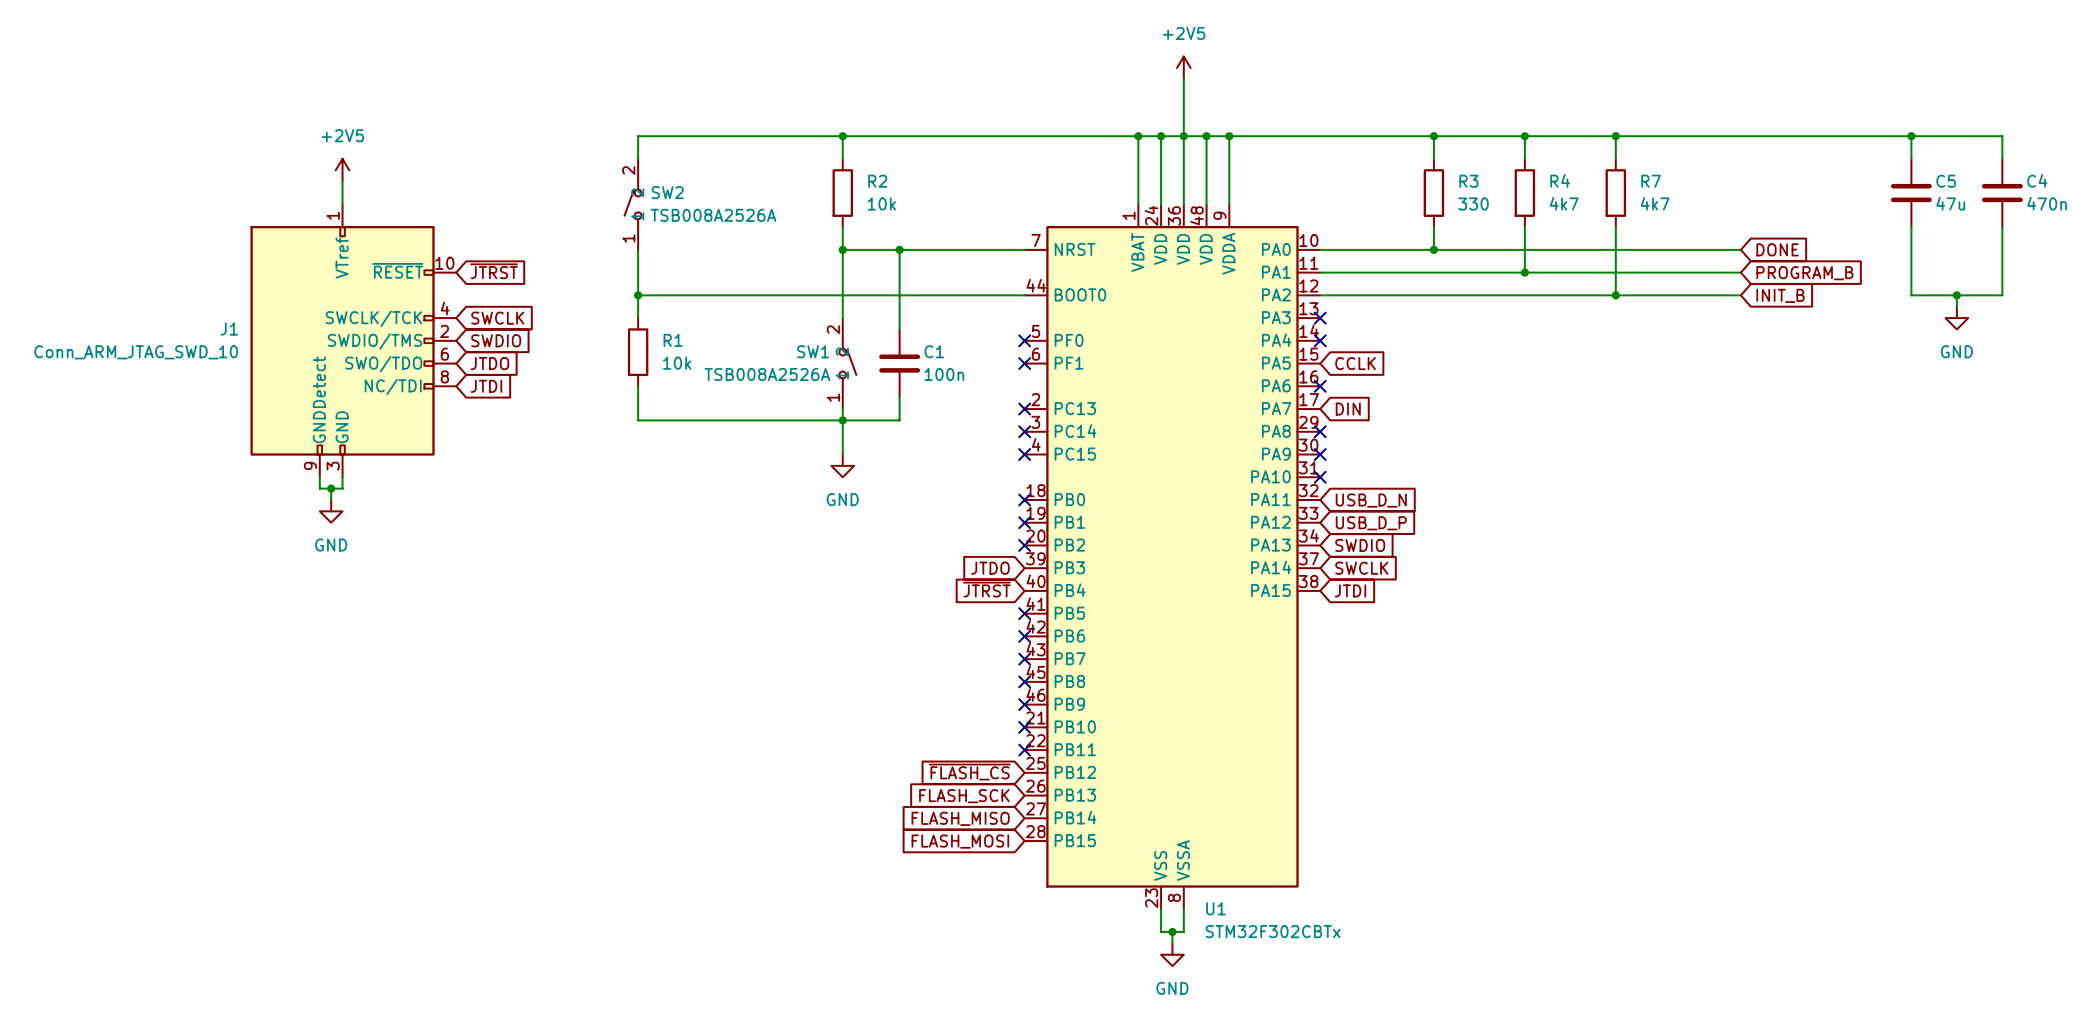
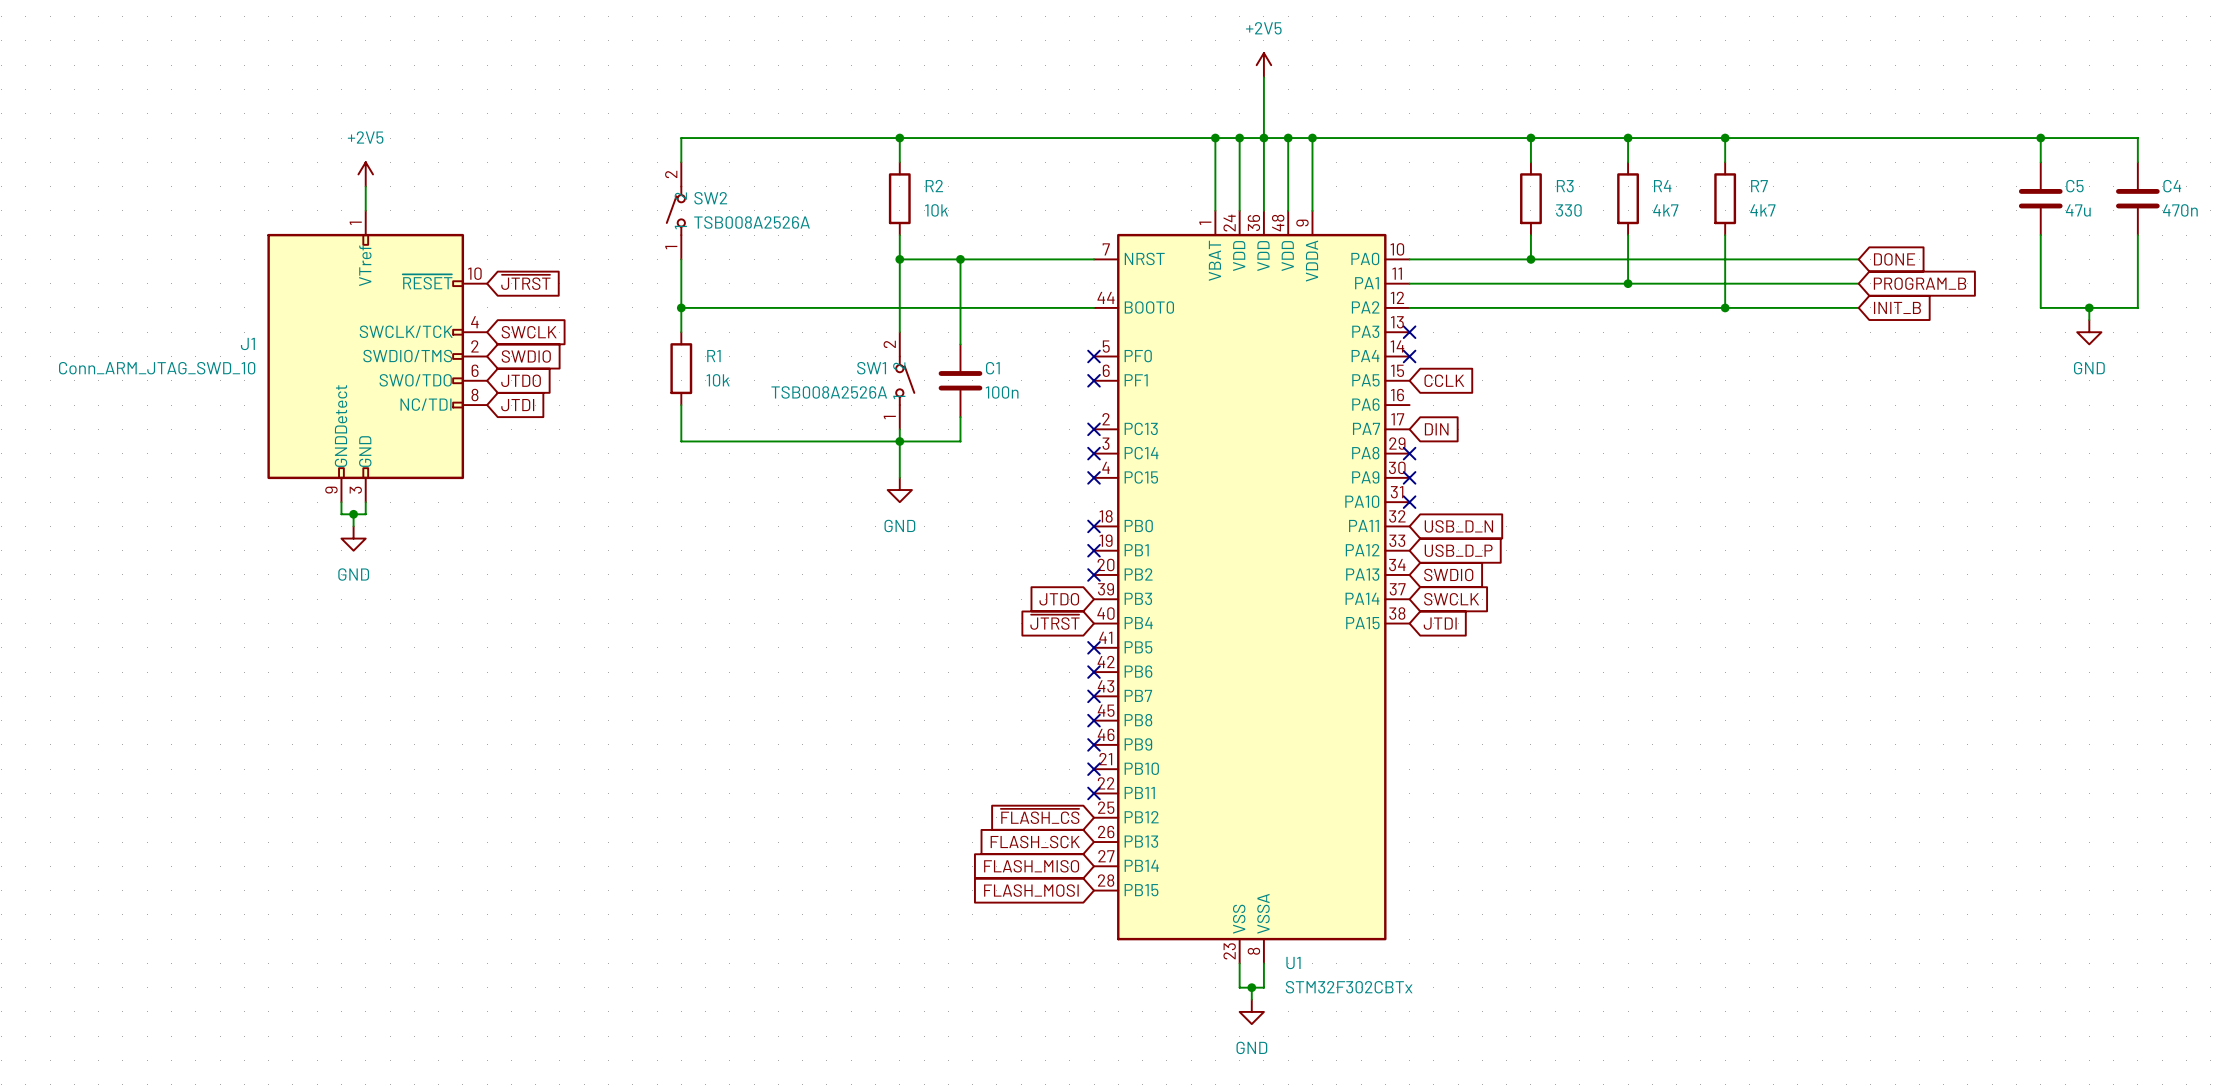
no-connect mark: (1320, 386) -> none

